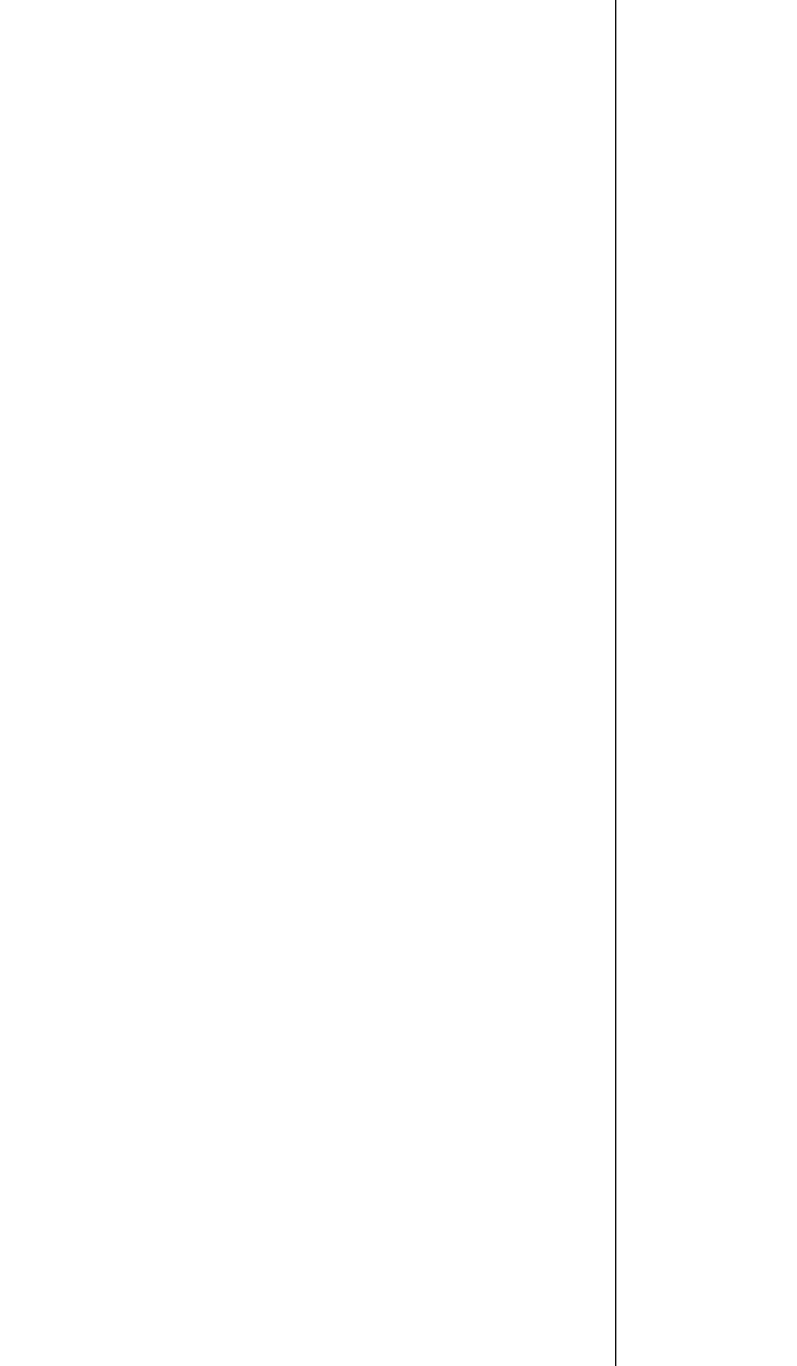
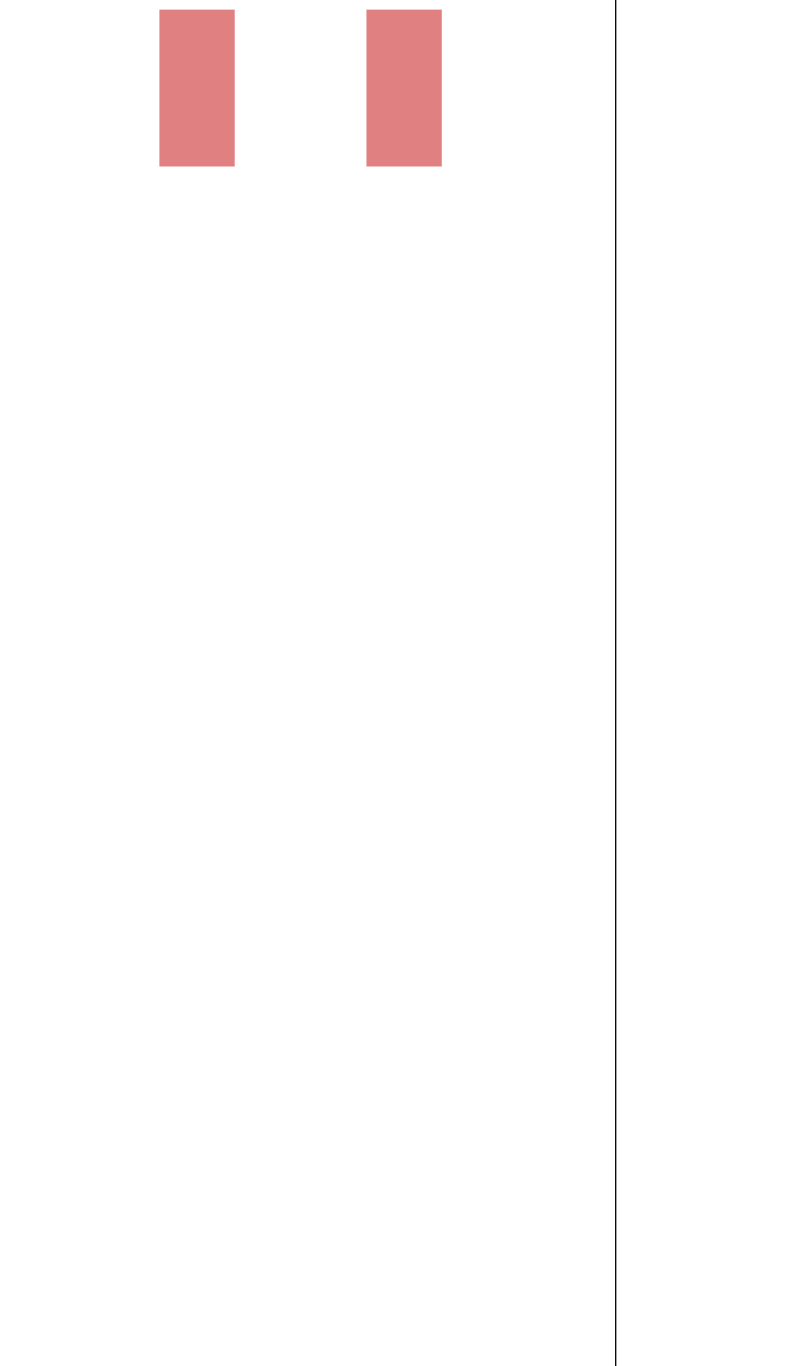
part: none -> (300, 88)

